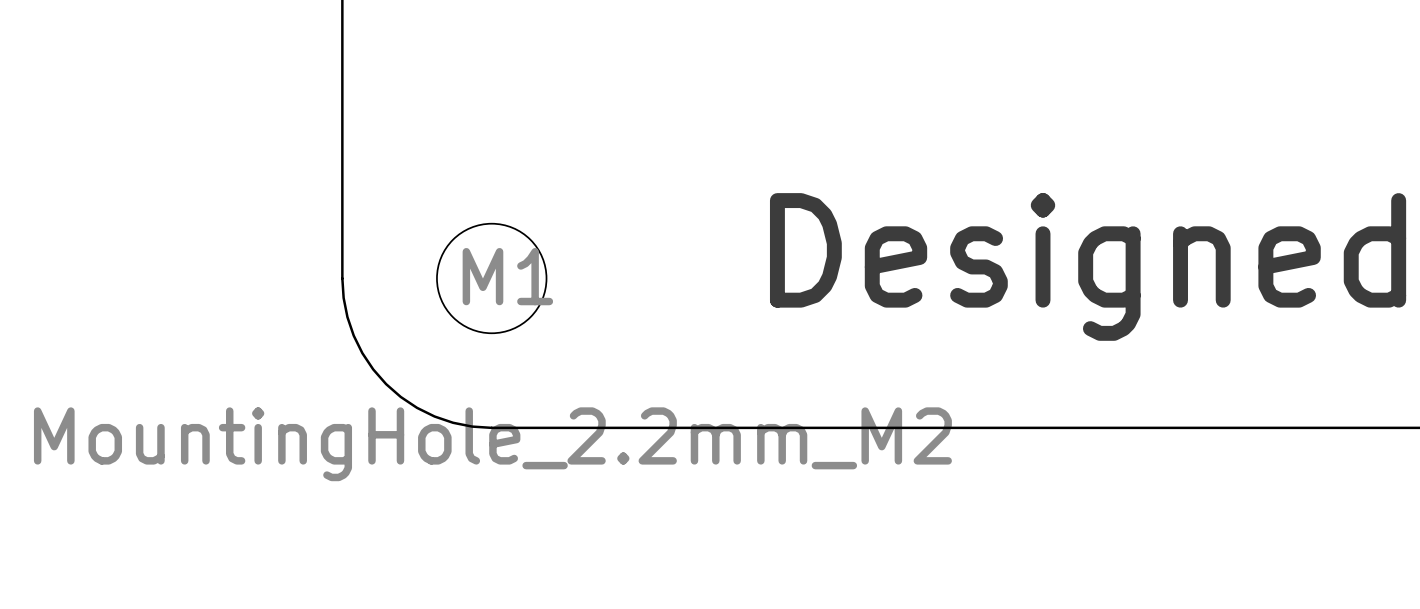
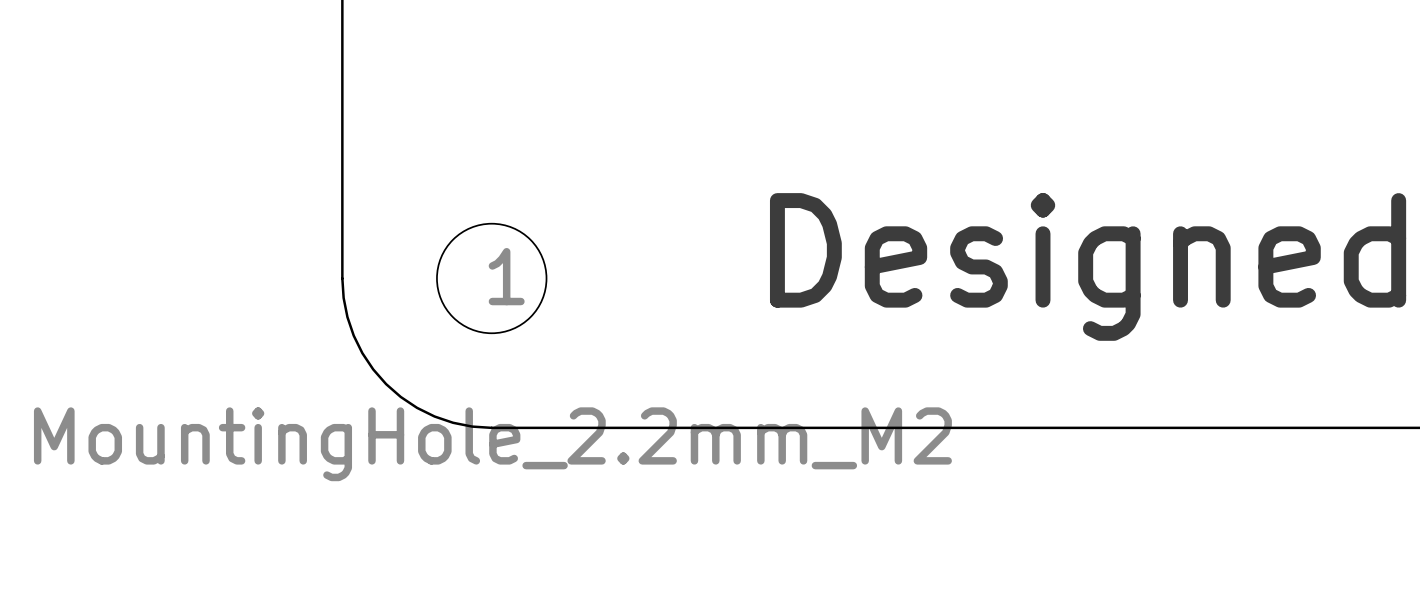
M1 name: M1 (507, 276) -> 1 (506, 276)

